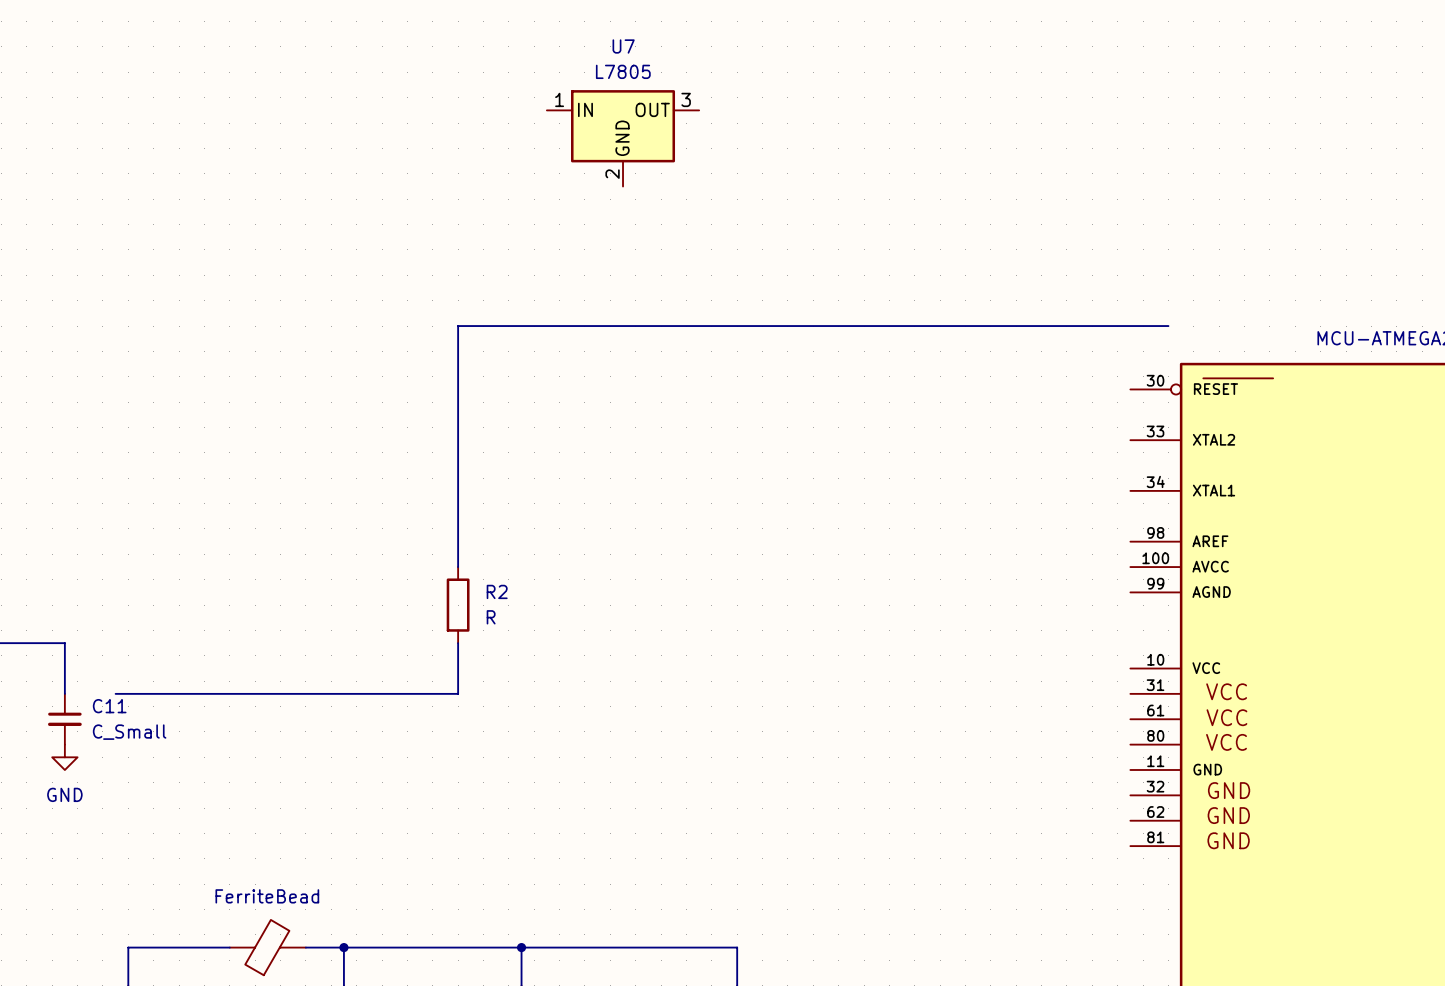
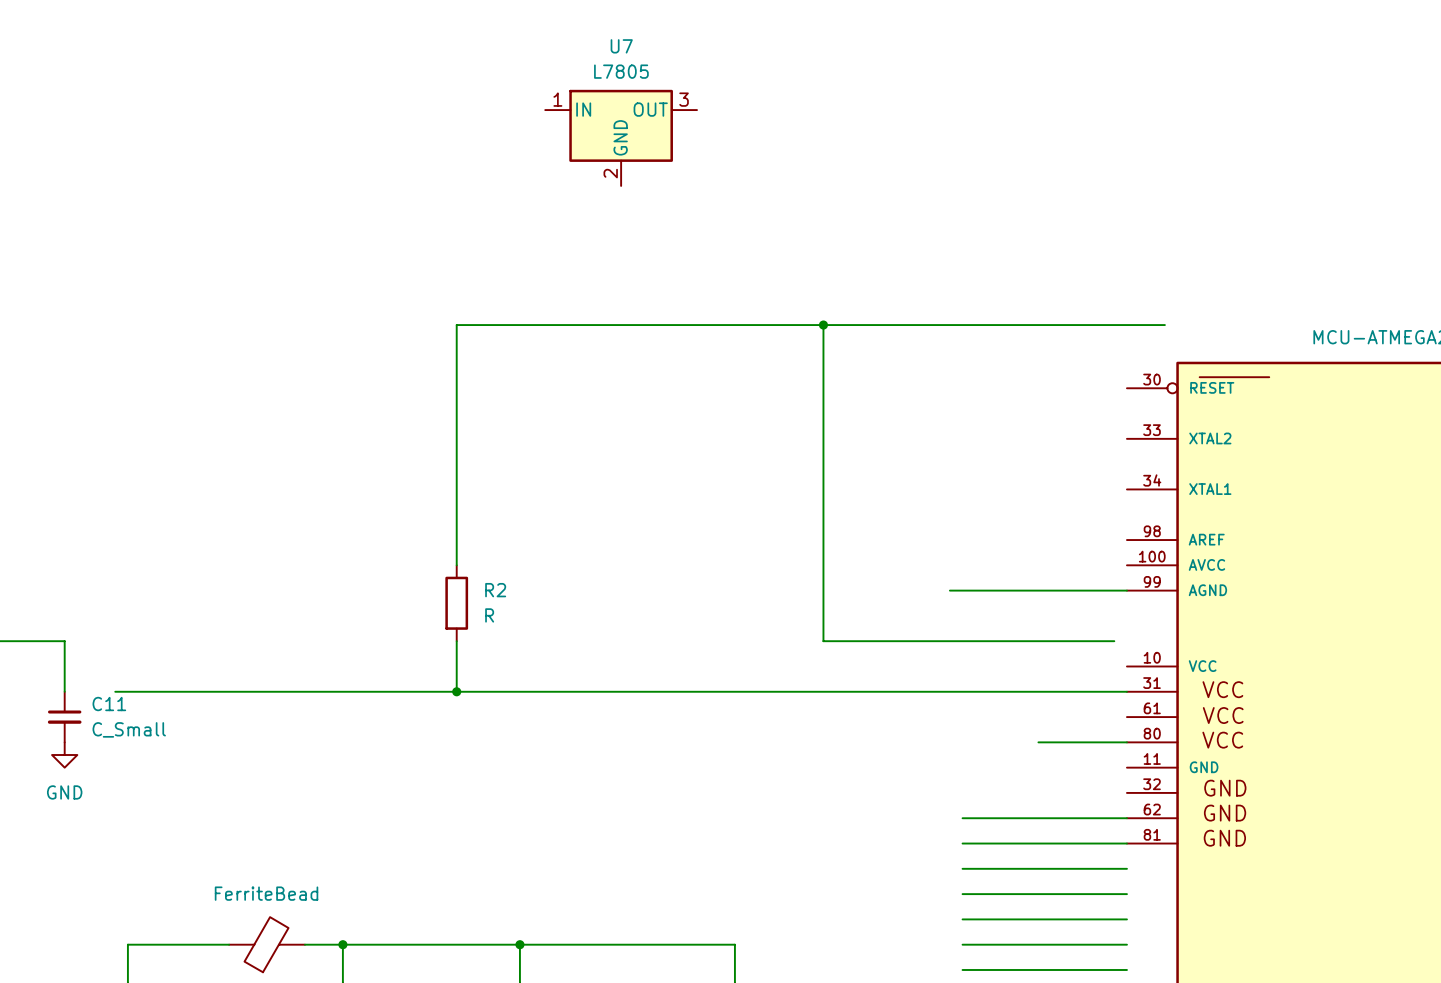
wire: none -> (823, 325) (823, 641) (1114, 641)
junction: none -> (823, 325)
wire: none -> (949, 590) (1126, 590)
wire: none -> (456, 691) (1126, 691)
junction: none -> (456, 691)
wire: none -> (1038, 742) (1126, 742)
wire: none -> (962, 818) (1126, 818)
wire: none -> (962, 843) (1126, 843)
wire: none -> (962, 868) (1126, 868)
wire: none -> (962, 894) (1126, 894)
wire: none -> (962, 919) (1126, 919)
wire: none -> (962, 944) (1126, 944)
wire: none -> (962, 969) (1126, 969)

